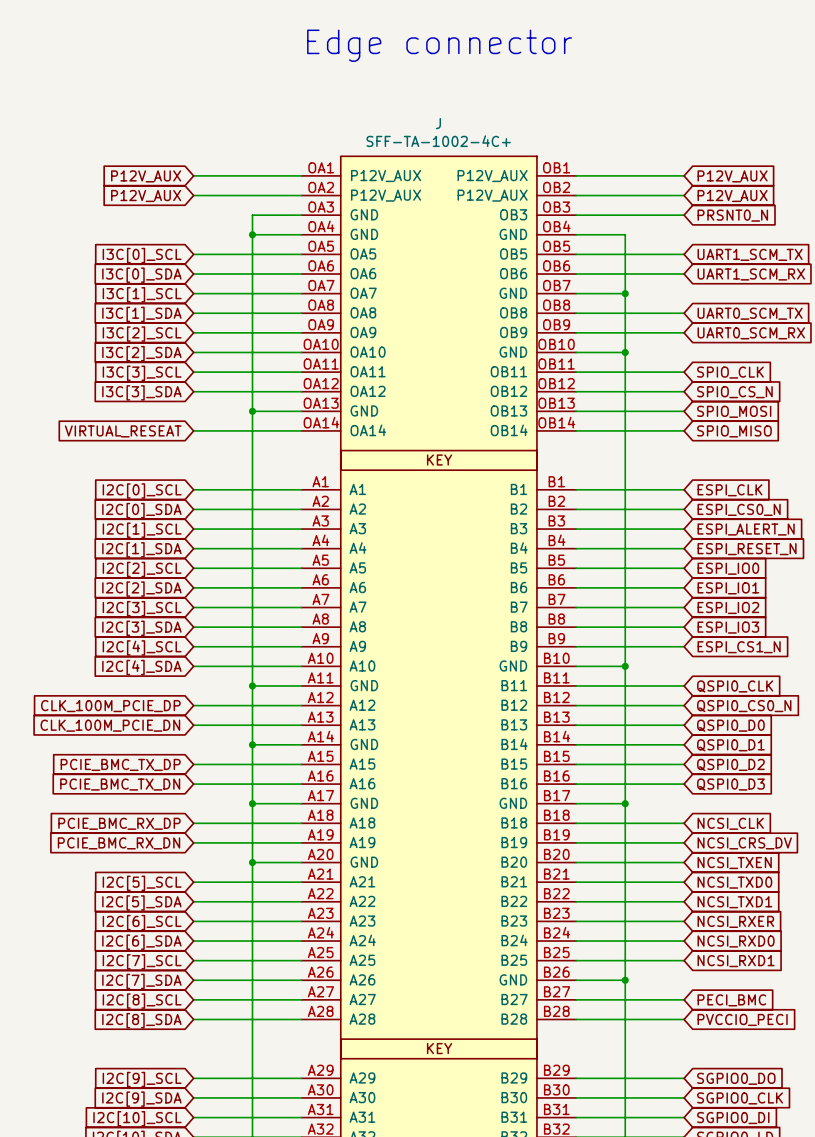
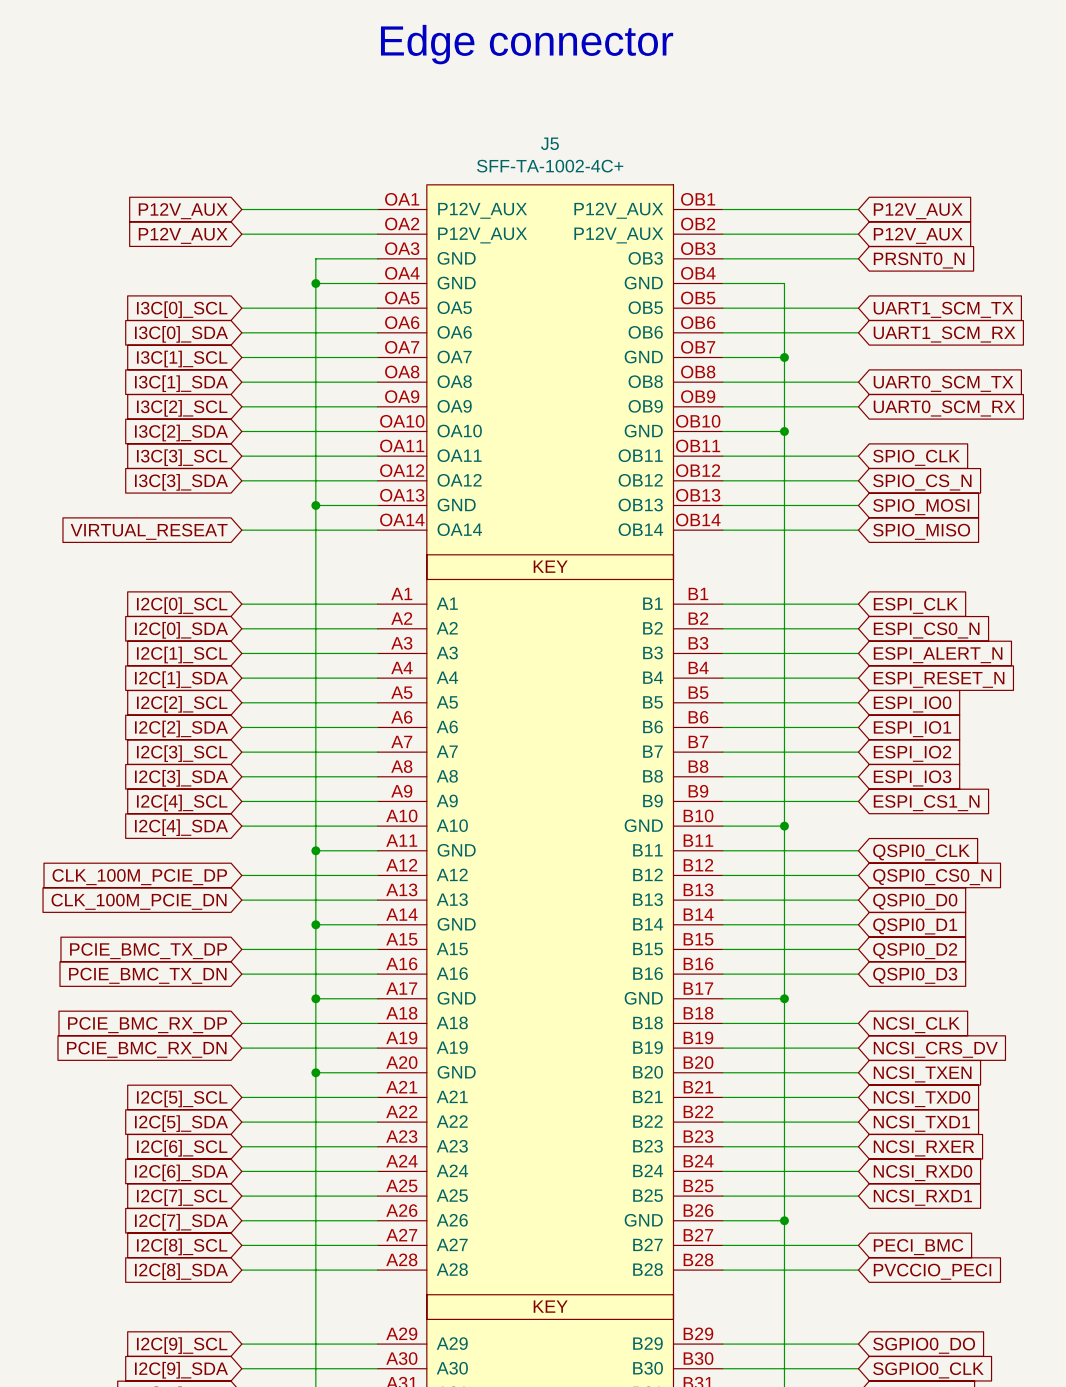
J name: J (438, 123) -> J5 (549, 143)

